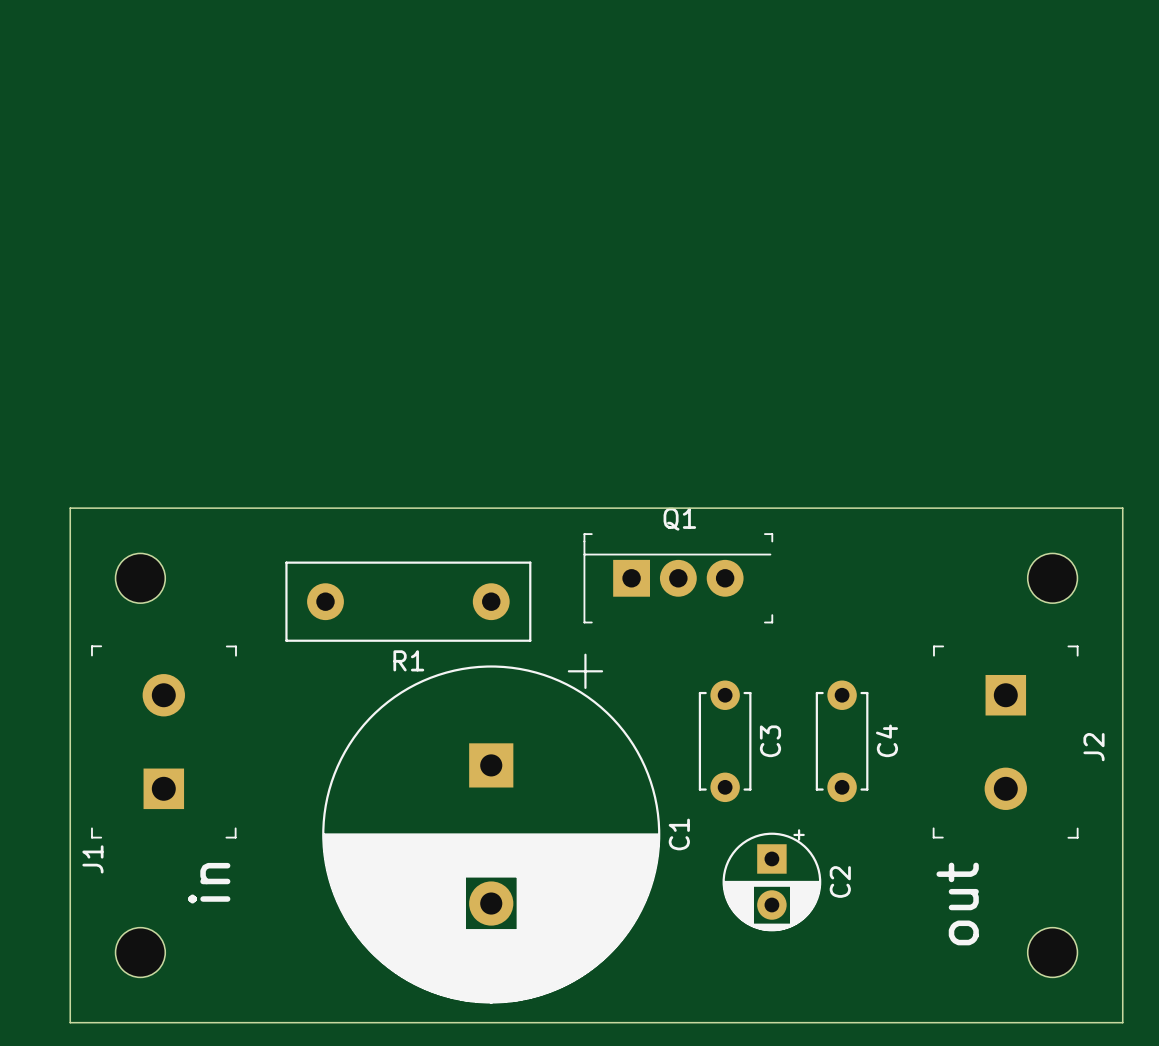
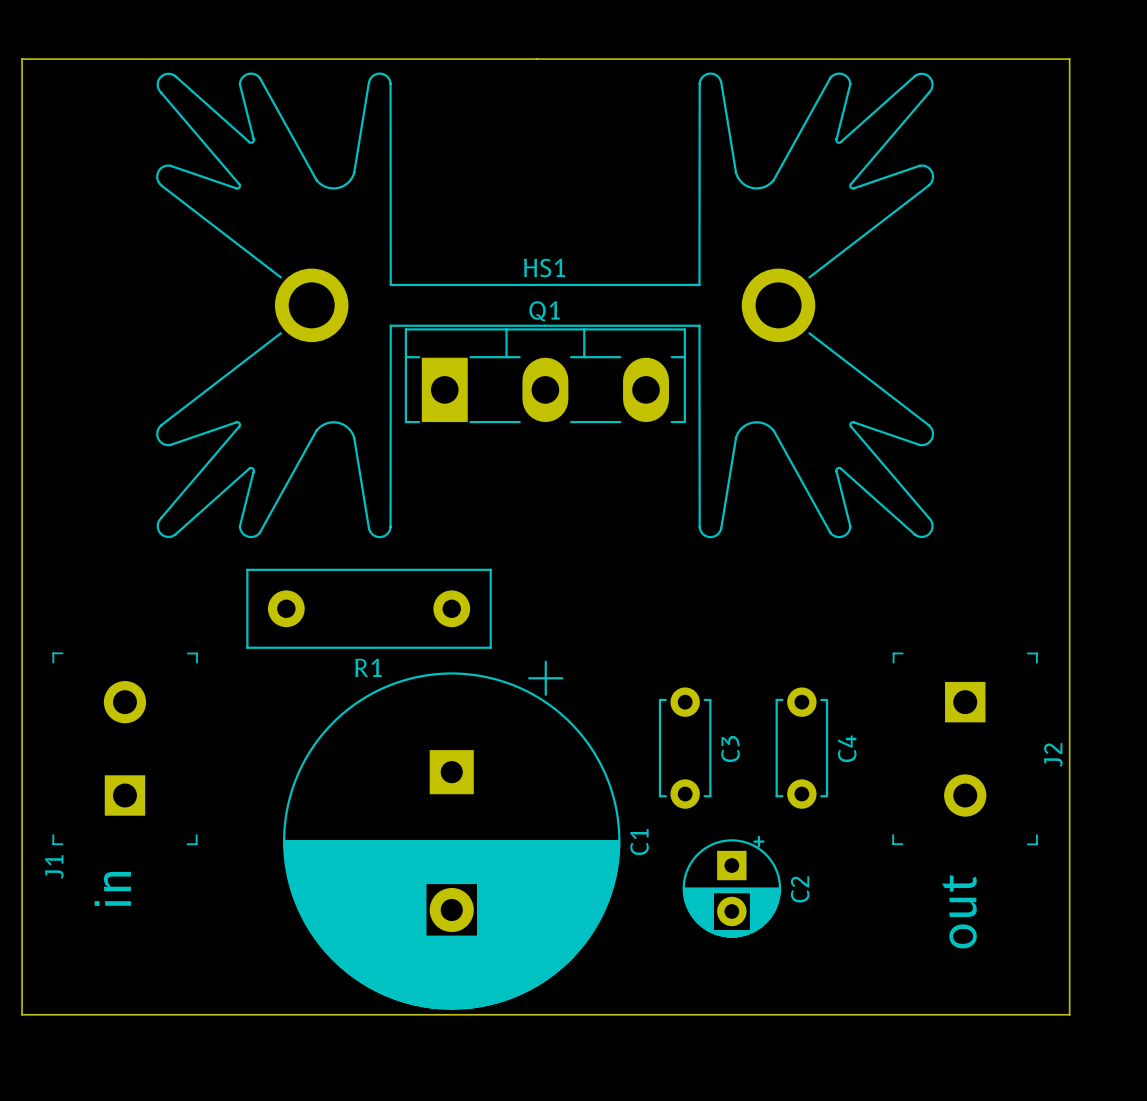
HS1: none -> (545, 305)
board edge: (70, 508) (70, 1022) (1122, 1022) (1122, 508) (70, 508) -> (22, 59) (22, 1014) (1069, 1014) (1069, 59) (22, 59)
Q1 footprint: [583, 533, 774, 624] -> [404, 328, 686, 424]
part: (140, 578) -> none
part: (1052, 578) -> none
text position: in (209, 883) -> in (112, 888)
text position: out (957, 903) -> out (959, 911)
part: (140, 952) -> none
part: (1052, 952) -> none

